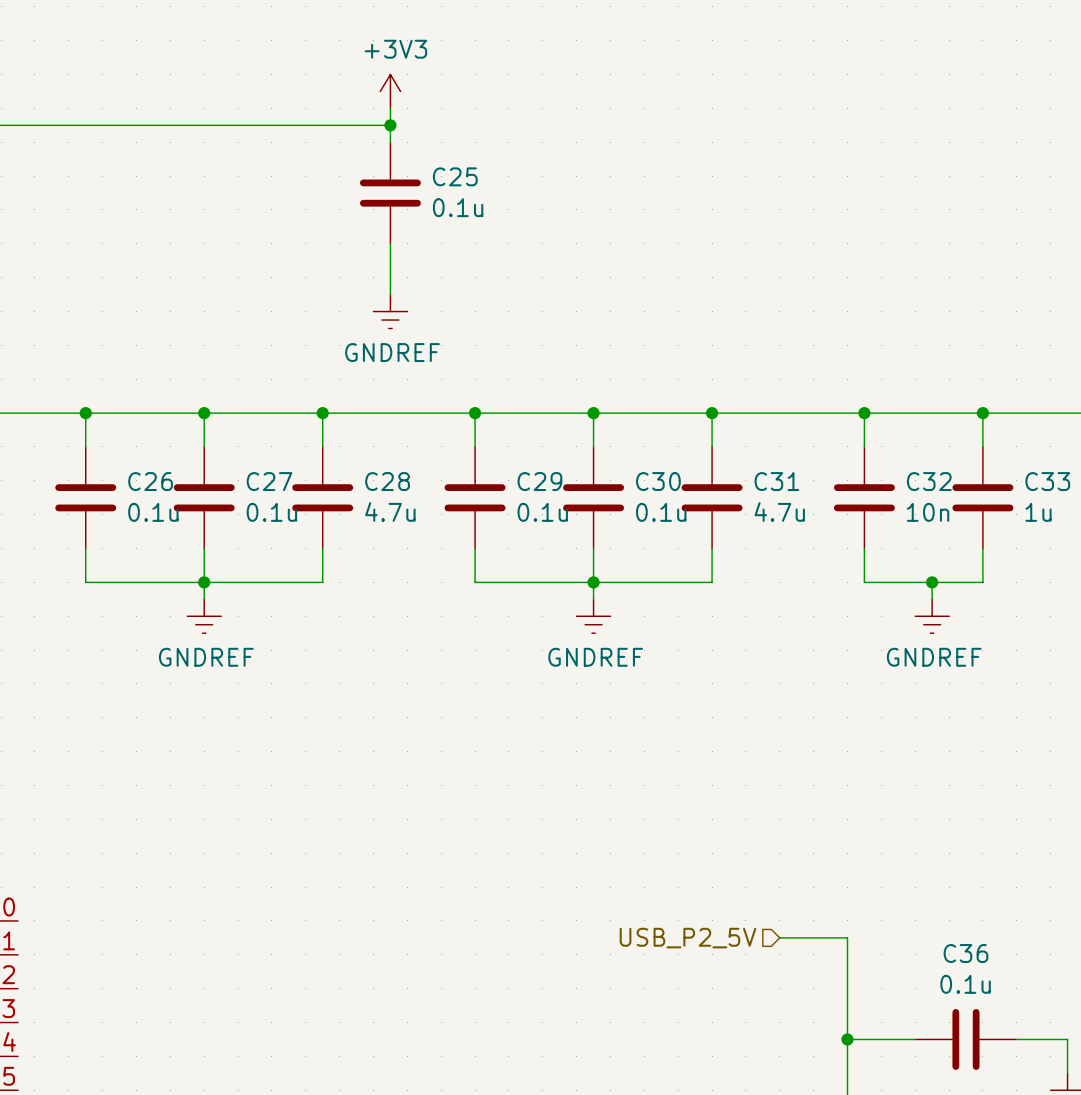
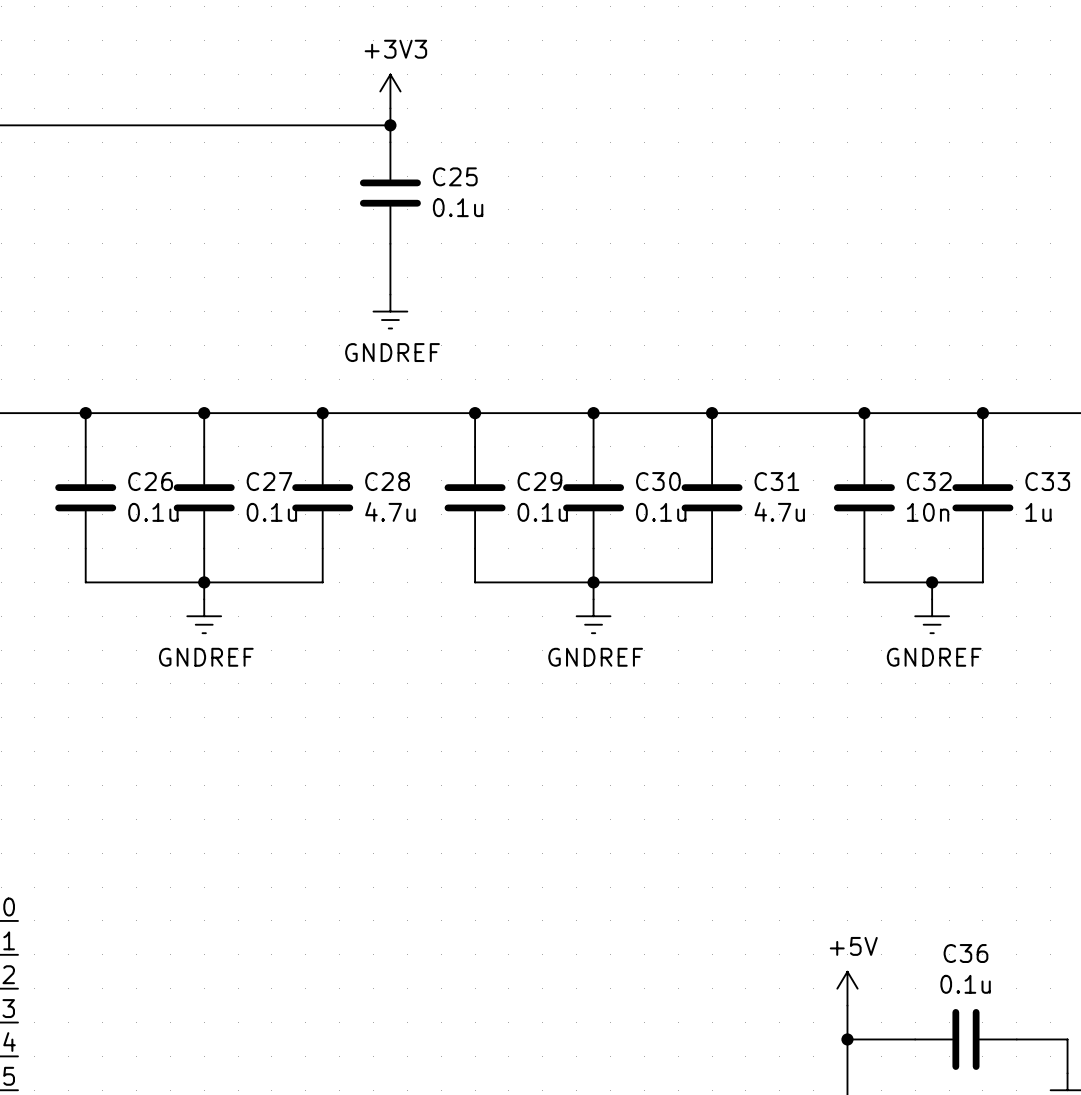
wire: (779, 937) (847, 937) (847, 1005) -> none
hierarchical label: USB_P2_5V (688, 938) -> none
power symbol: none -> +5V (847, 988)

